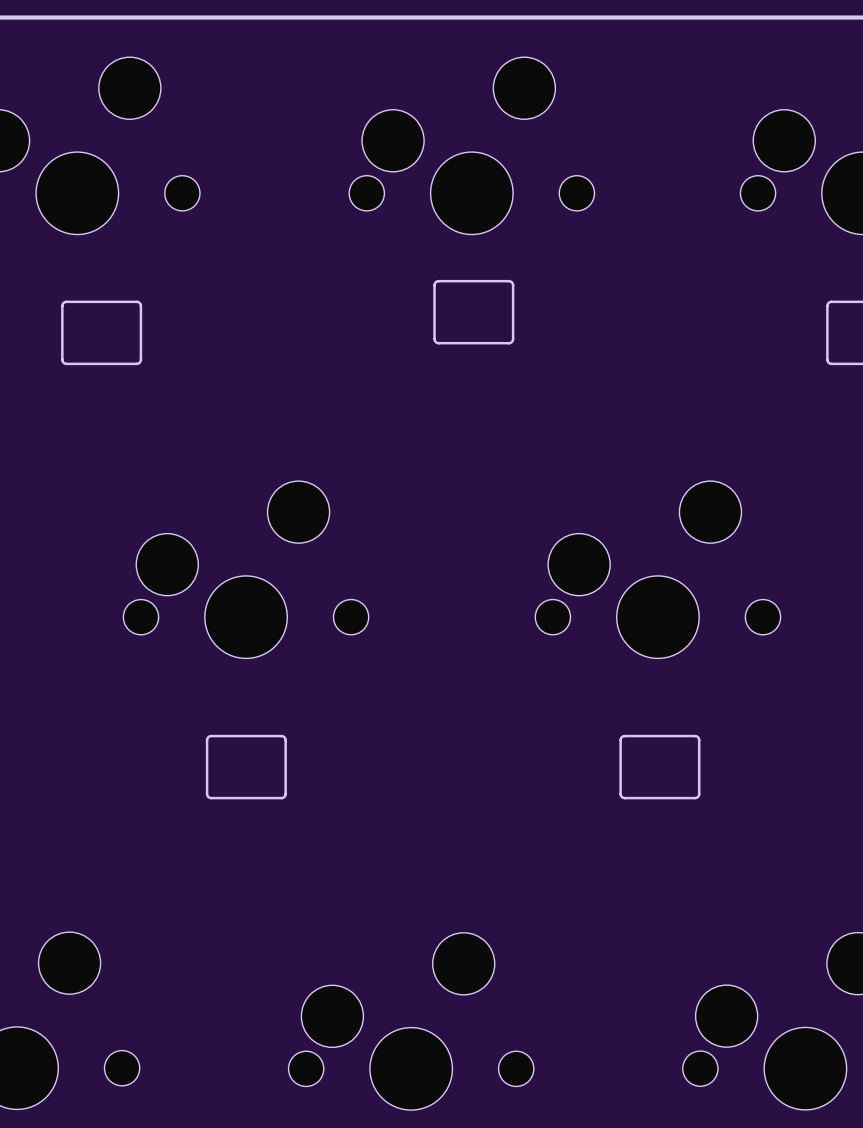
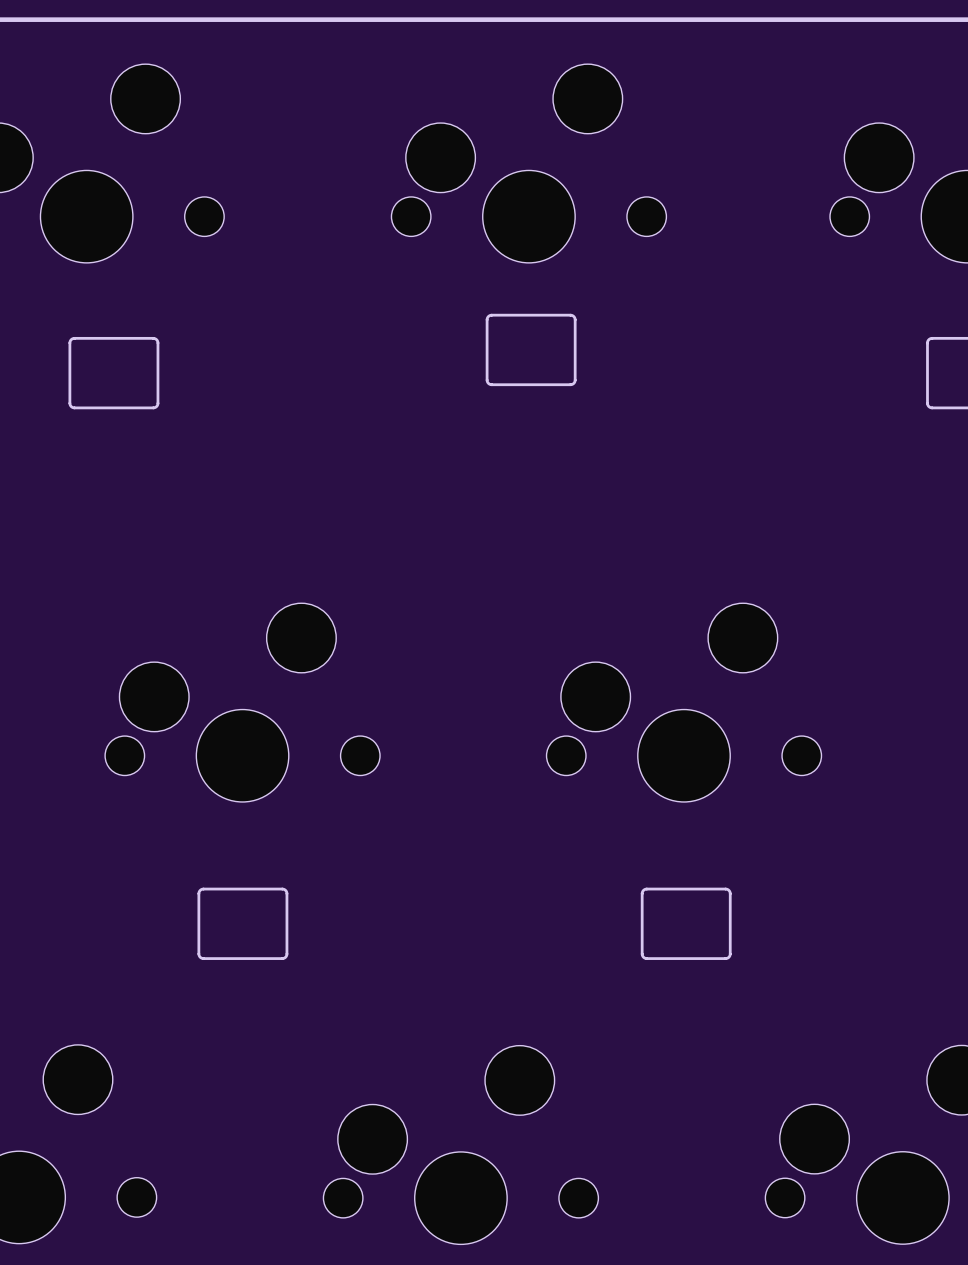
part position: (246, 569) -> (242, 702)
part position: (657, 569) -> (684, 702)
part position: (246, 767) -> (242, 923)
part position: (659, 767) -> (686, 923)

